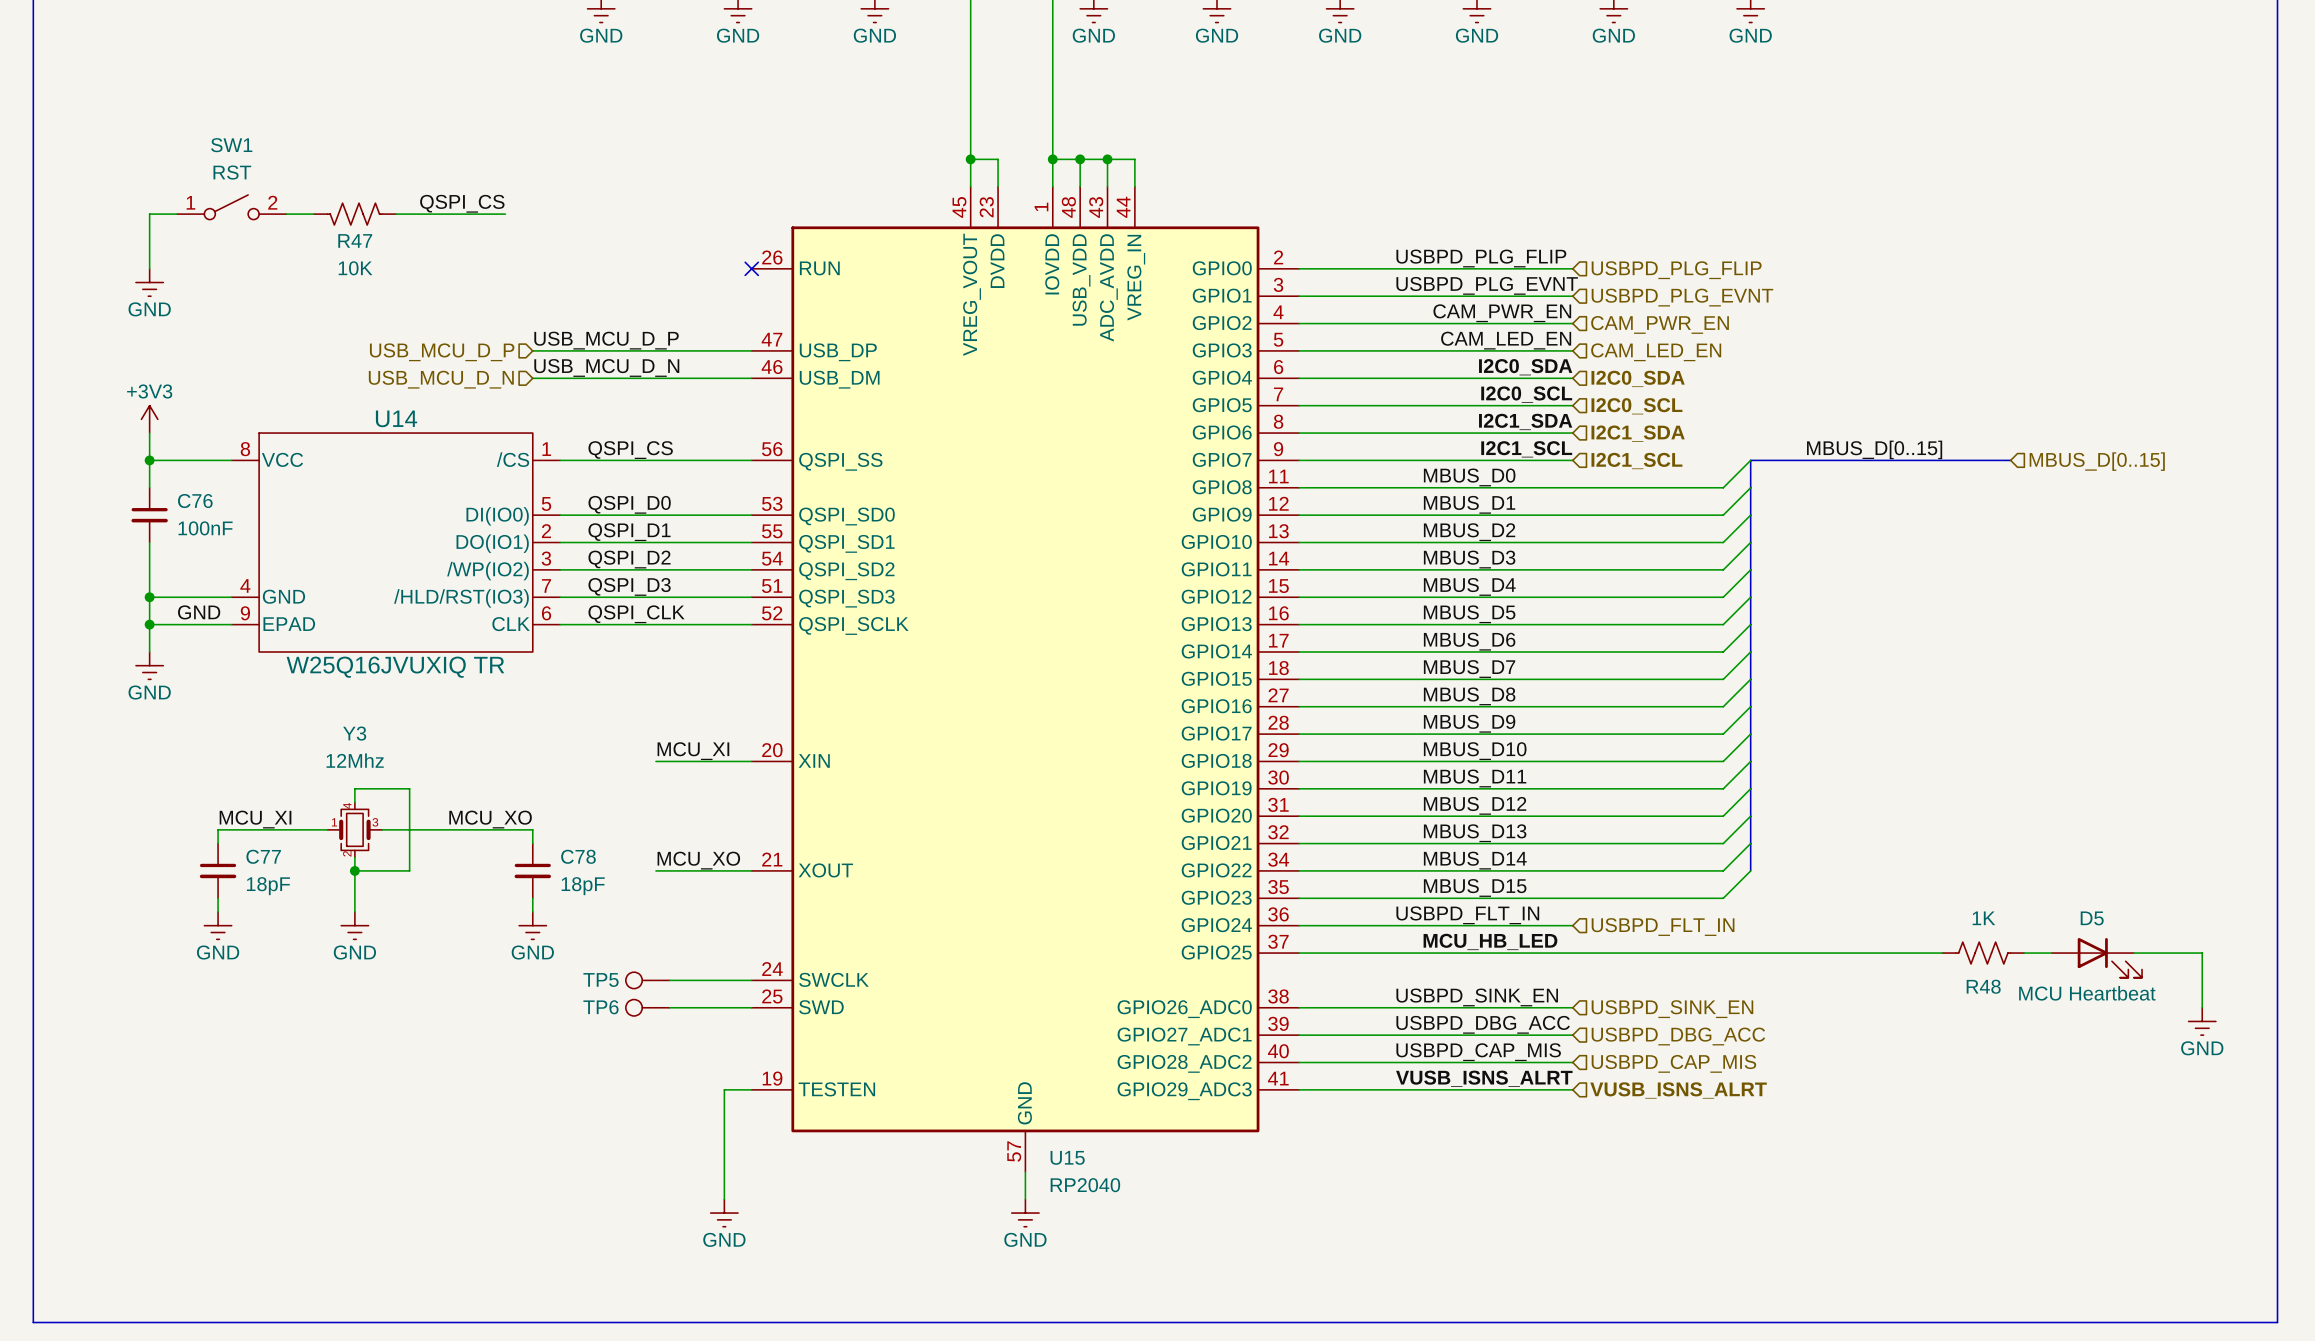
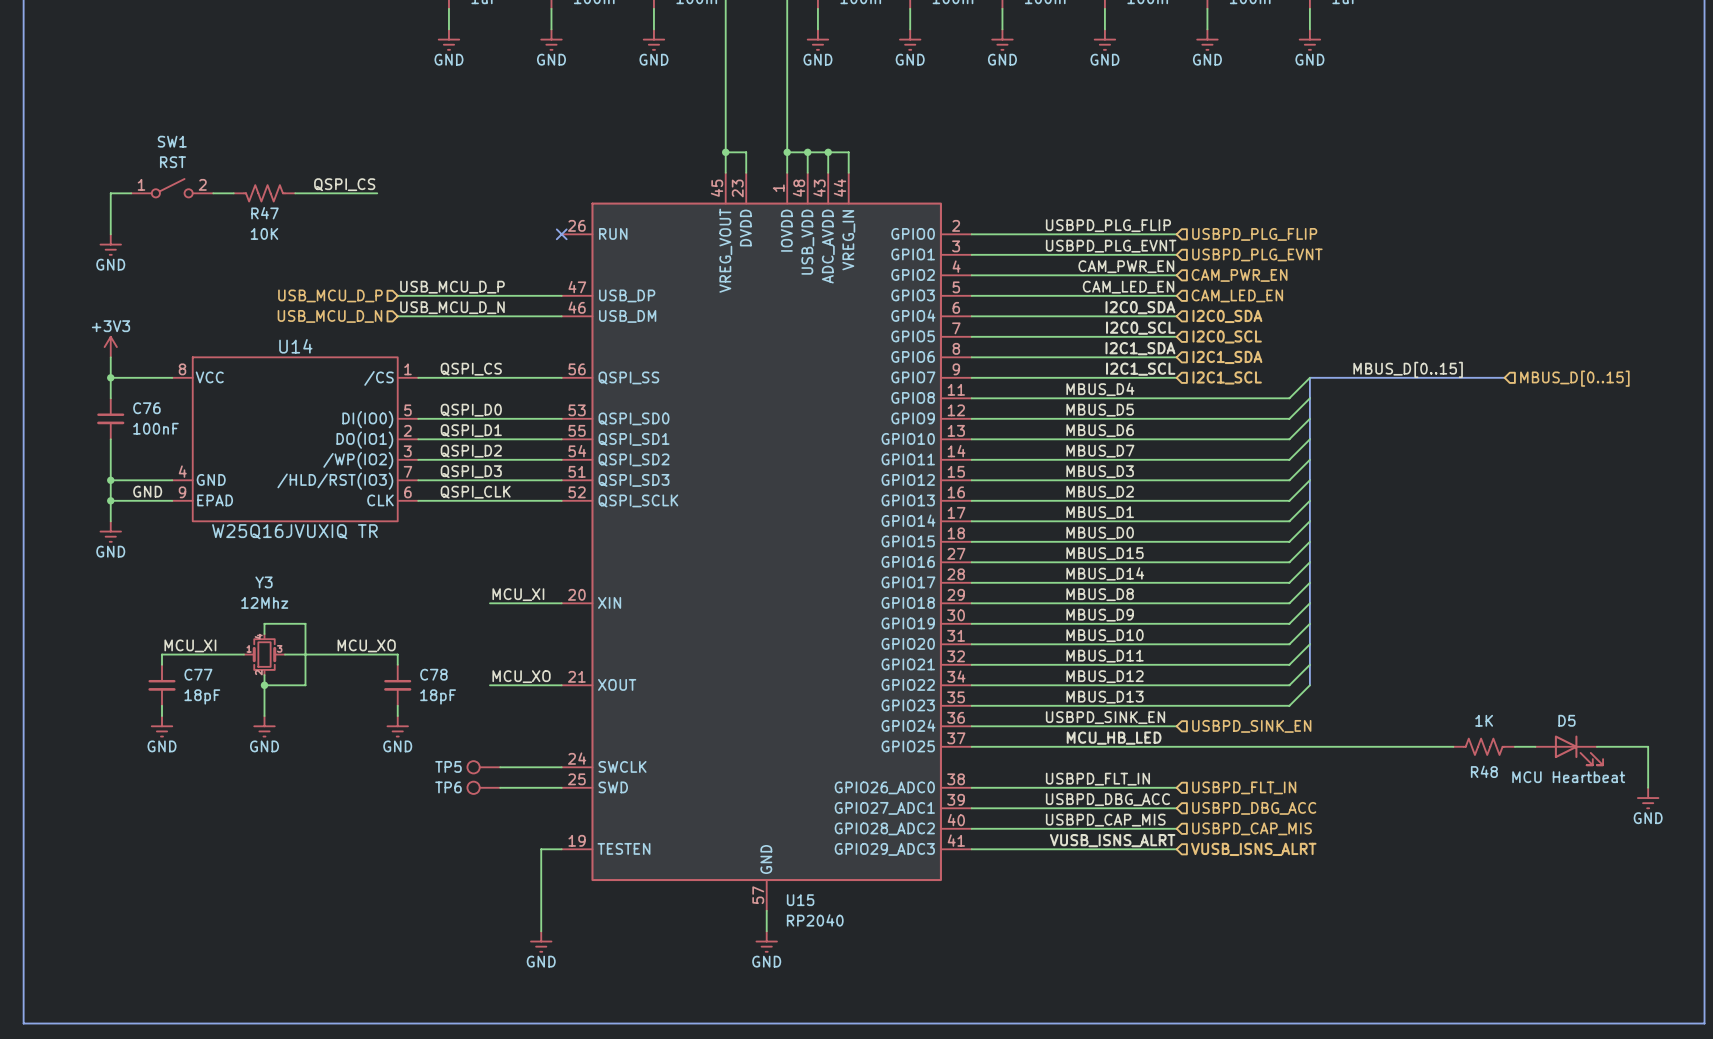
label: MBUS_D0 (1469, 477) -> MBUS_D4 (1100, 389)
label: MBUS_D1 (1469, 504) -> MBUS_D5 (1100, 410)
label: MBUS_D2 (1469, 532) -> MBUS_D6 (1100, 430)
label: MBUS_D3 (1469, 559) -> MBUS_D7 (1100, 451)
label: MBUS_D4 (1469, 586) -> MBUS_D3 (1100, 471)
label: MBUS_D5 (1469, 614) -> MBUS_D2 (1100, 492)
label: MBUS_D6 (1469, 641) -> MBUS_D1 (1100, 512)
label: MBUS_D7 (1469, 669) -> MBUS_D0 (1100, 533)
label: MBUS_D8 (1469, 696) -> MBUS_D15 (1105, 553)
label: MBUS_D9 (1469, 723) -> MBUS_D14 (1105, 573)
label: MBUS_D10 (1475, 751) -> MBUS_D8 (1100, 594)
label: MBUS_D11 (1475, 778) -> MBUS_D9 (1100, 615)
label: MBUS_D12 (1475, 805) -> MBUS_D10 (1105, 635)
label: MBUS_D13 (1475, 833) -> MBUS_D11 (1105, 656)
label: MBUS_D14 (1475, 860) -> MBUS_D12 (1105, 676)
label: MBUS_D15 (1475, 887) -> MBUS_D13 (1105, 697)
label: USBPD_FLT_IN (1467, 915) -> USBPD_SINK_EN (1105, 717)
hierarchical label: USBPD_FLT_IN (1663, 927) -> USBPD_SINK_EN (1251, 726)
label: USBPD_SINK_EN (1477, 997) -> USBPD_FLT_IN (1097, 779)
hierarchical label: USBPD_SINK_EN (1672, 1009) -> USBPD_FLT_IN (1244, 787)

